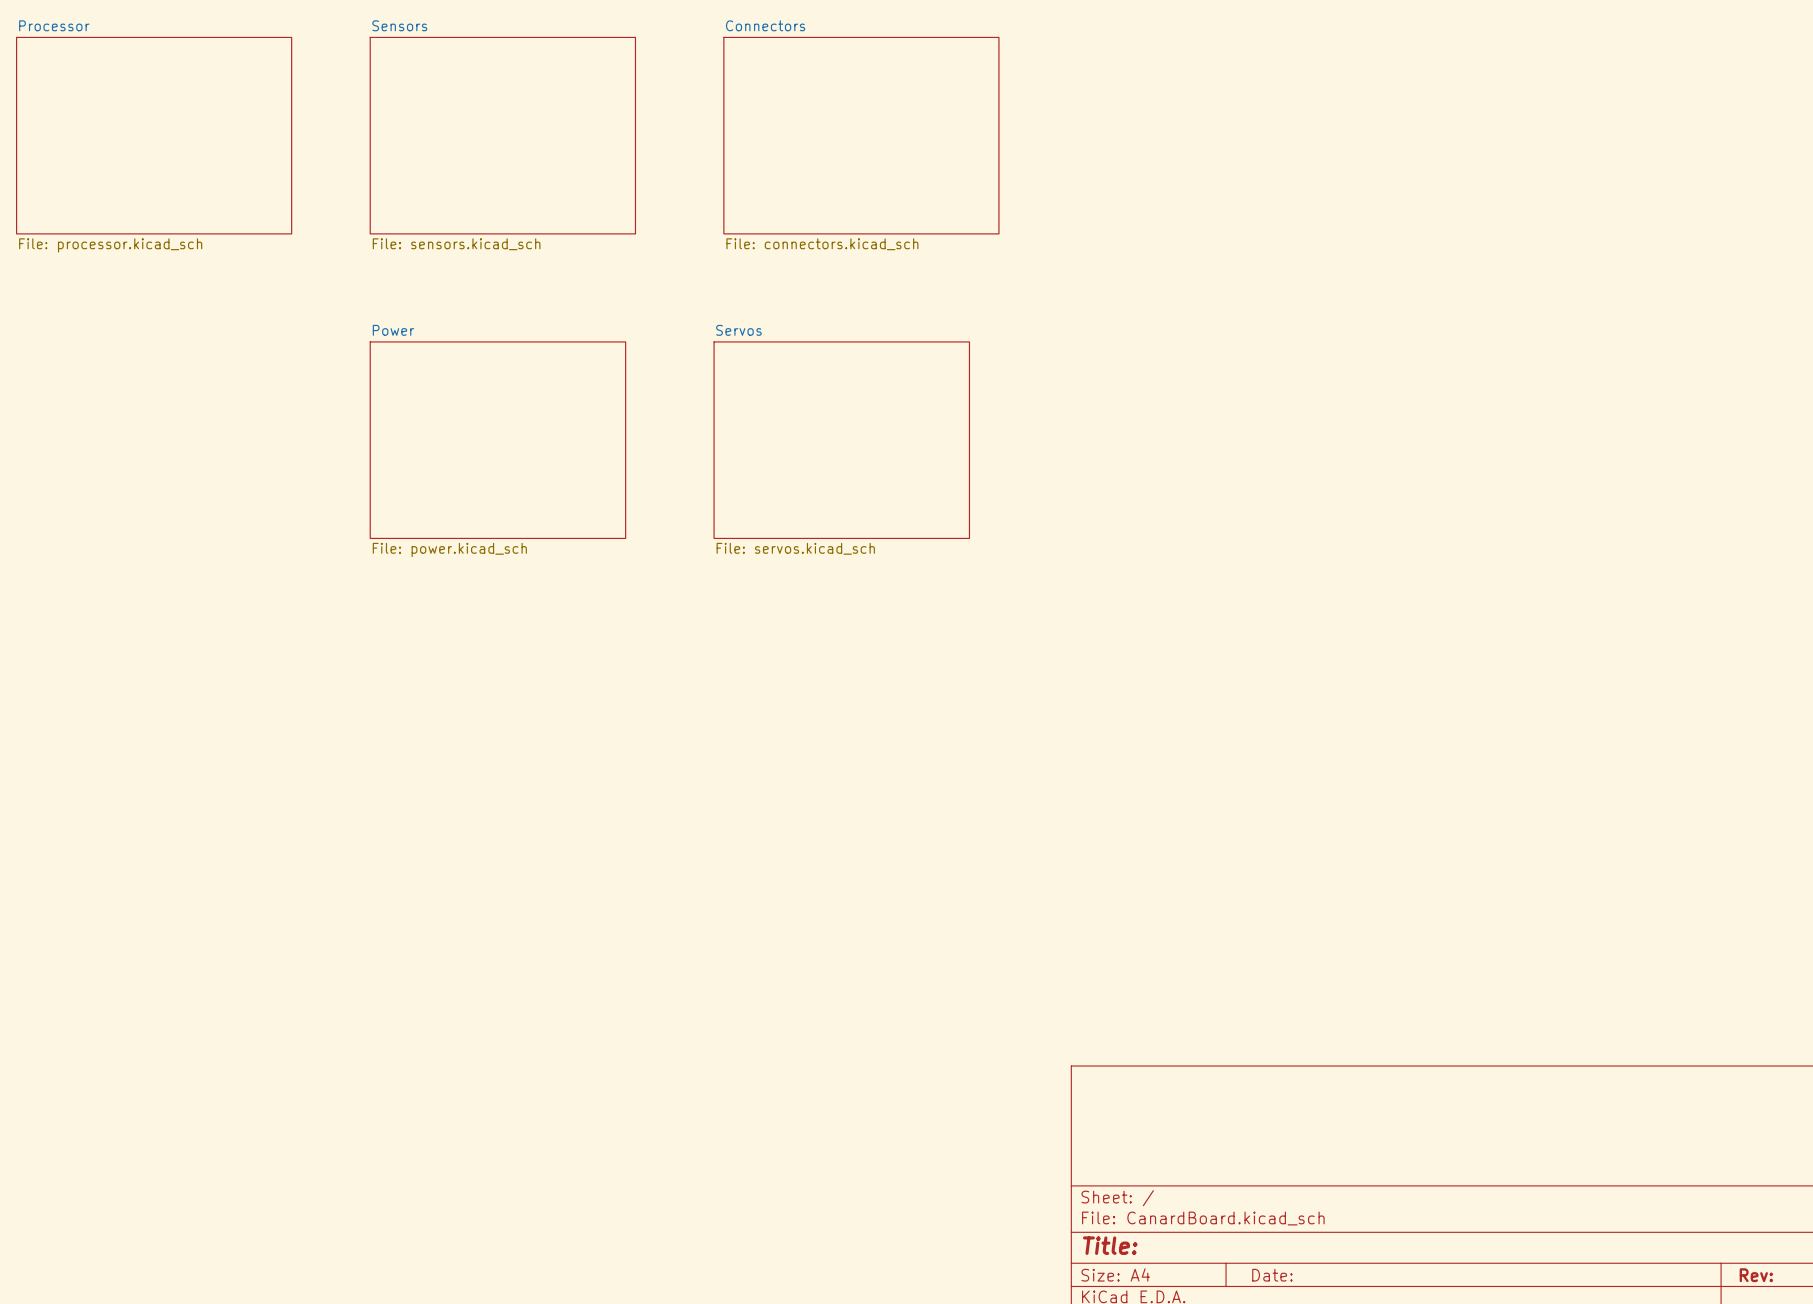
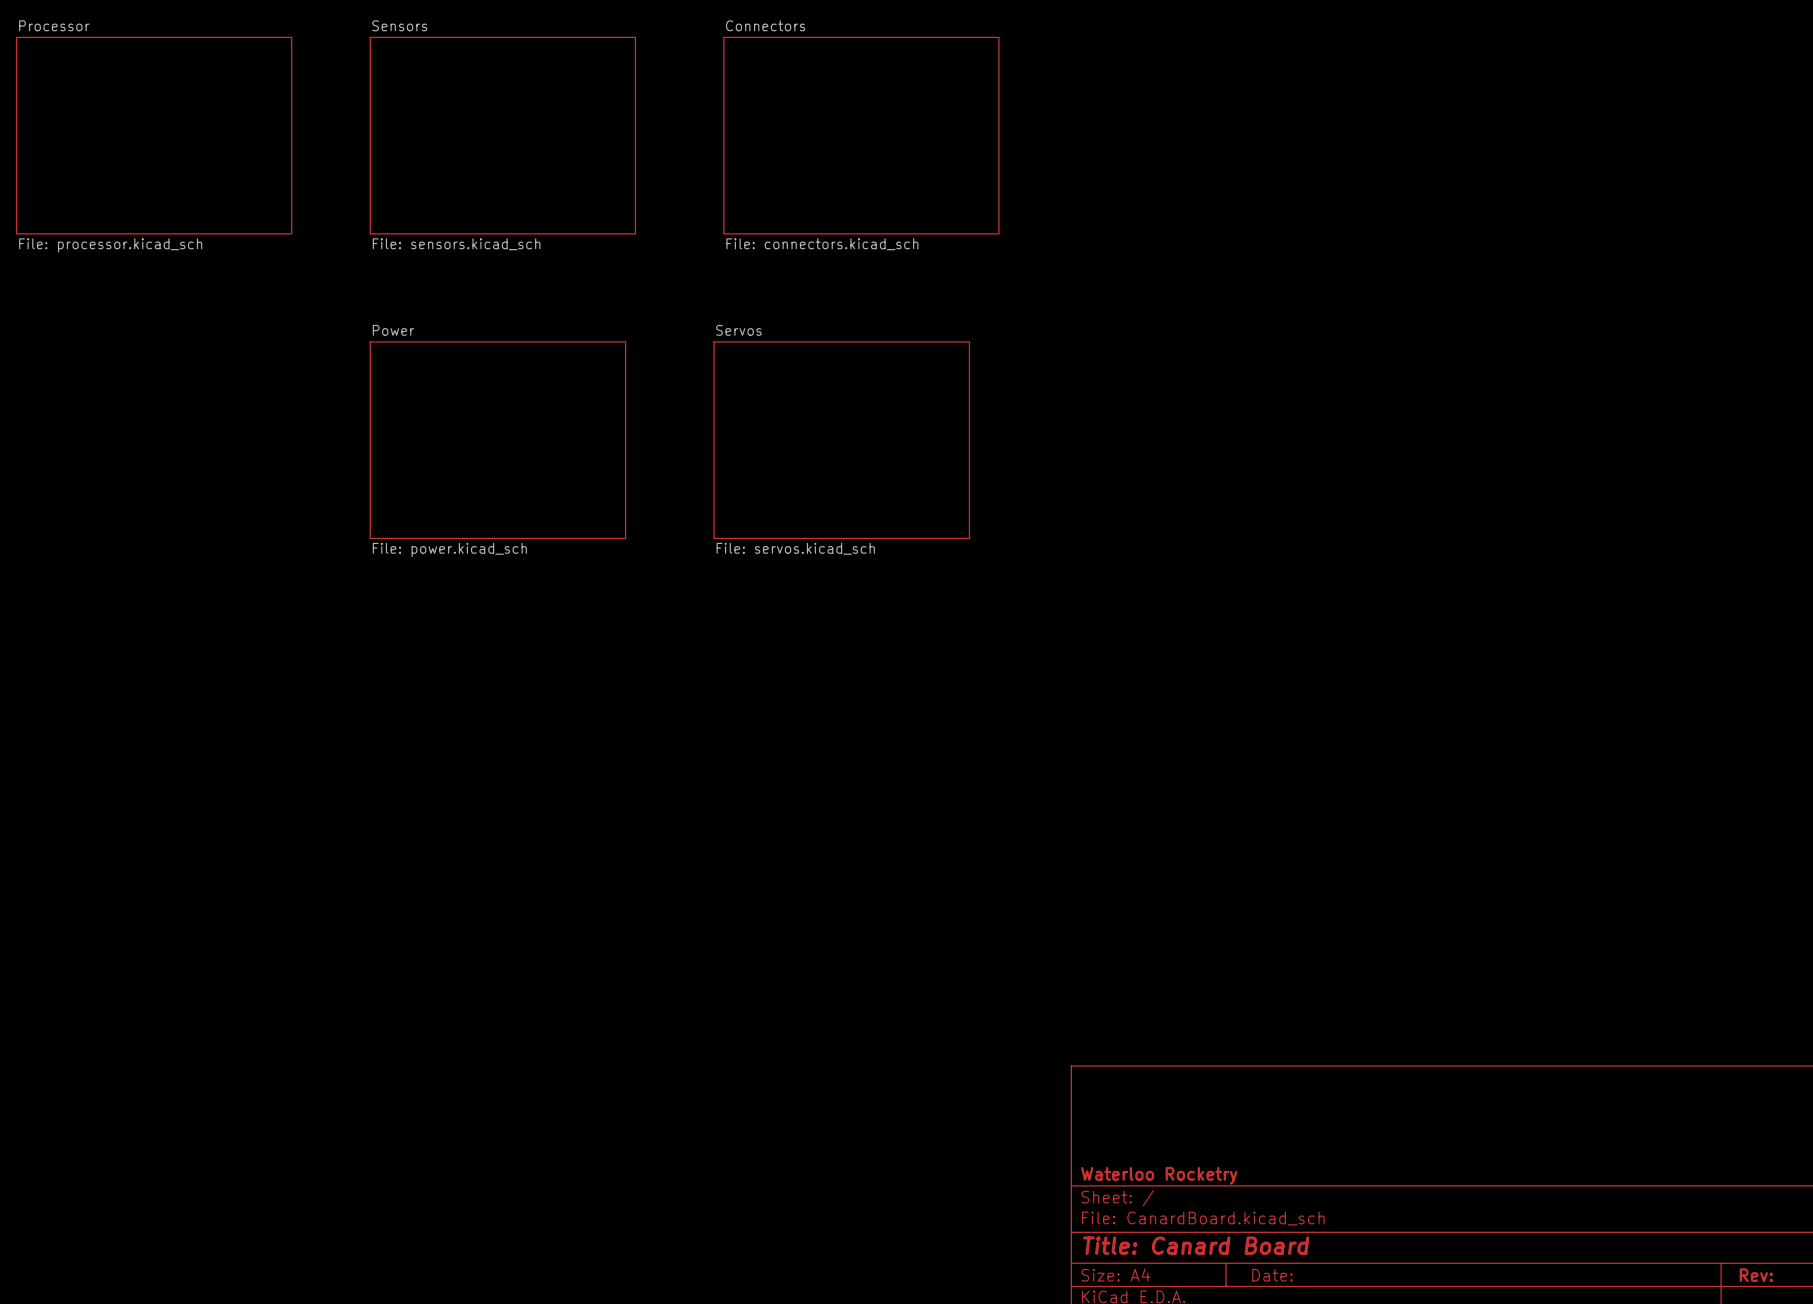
title block: none -> Waterloo Rocketry (1159, 1175)
title block: Title: (1110, 1245) -> Title: Canard Board (1196, 1245)

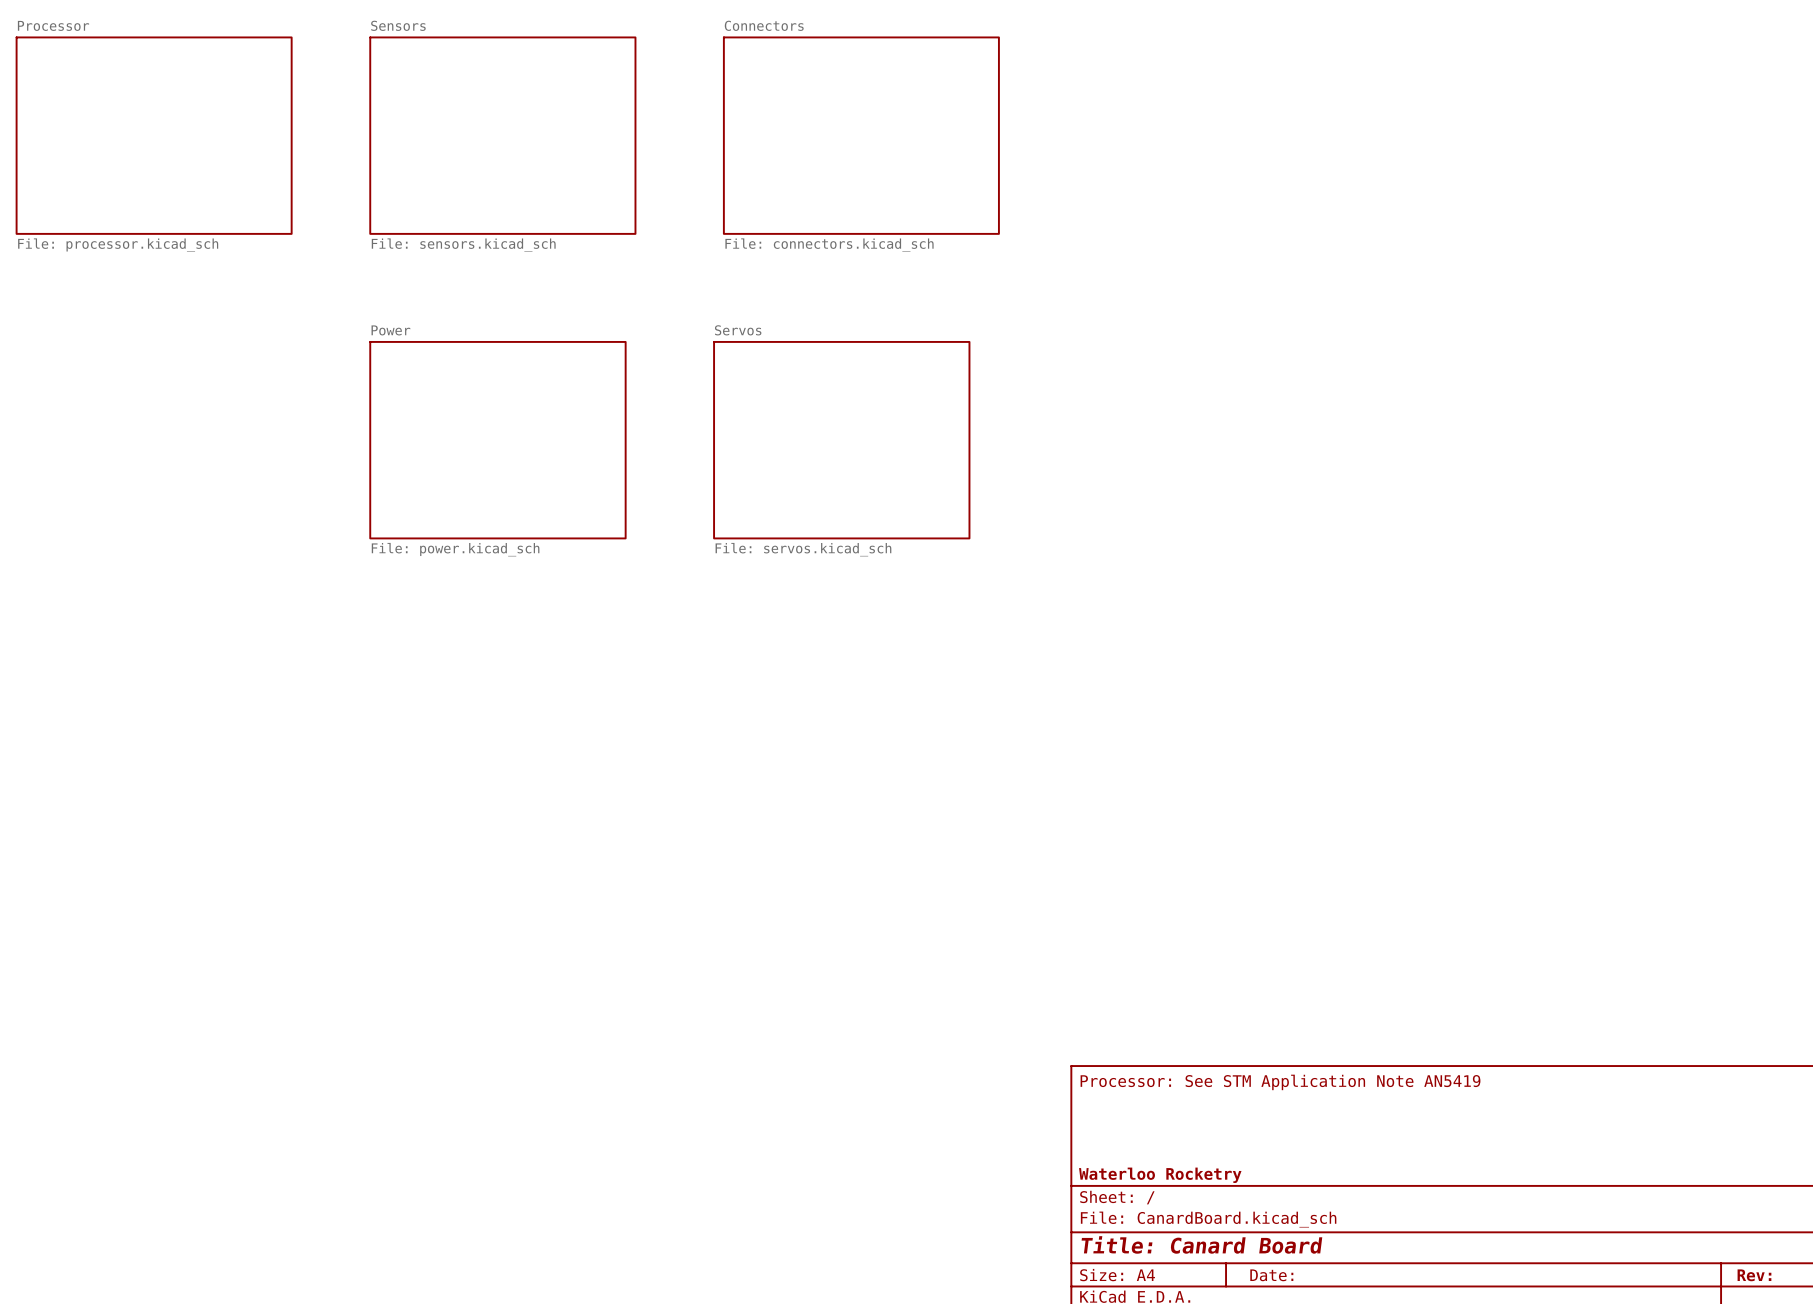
title block: none -> Processor: See STM Application Note AN5419 (1280, 1082)

